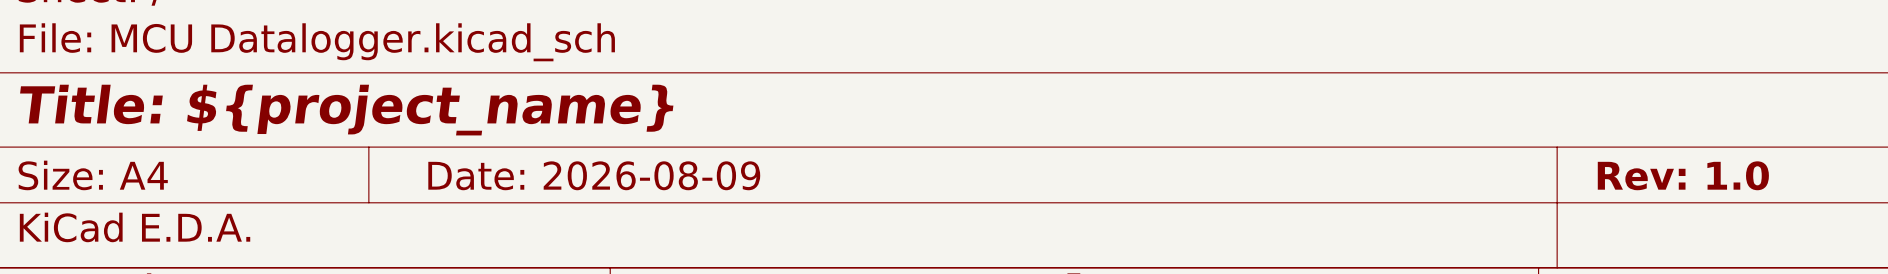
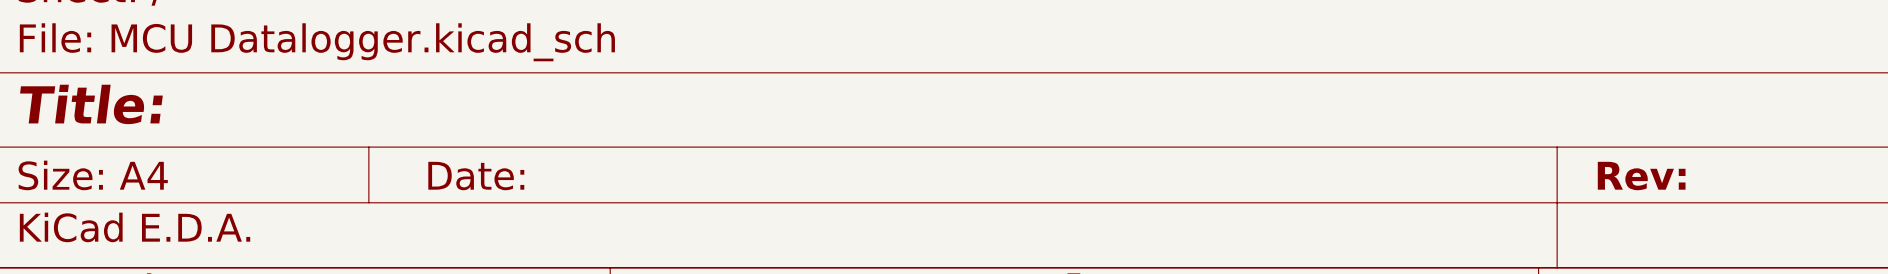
title block: Title: ${project_name} (346, 110) -> Title: (91, 104)
title block: Date: 2026-08-09 (594, 175) -> Date: (476, 176)
title block: Rev: 1.0 (1683, 175) -> Rev: (1641, 176)

